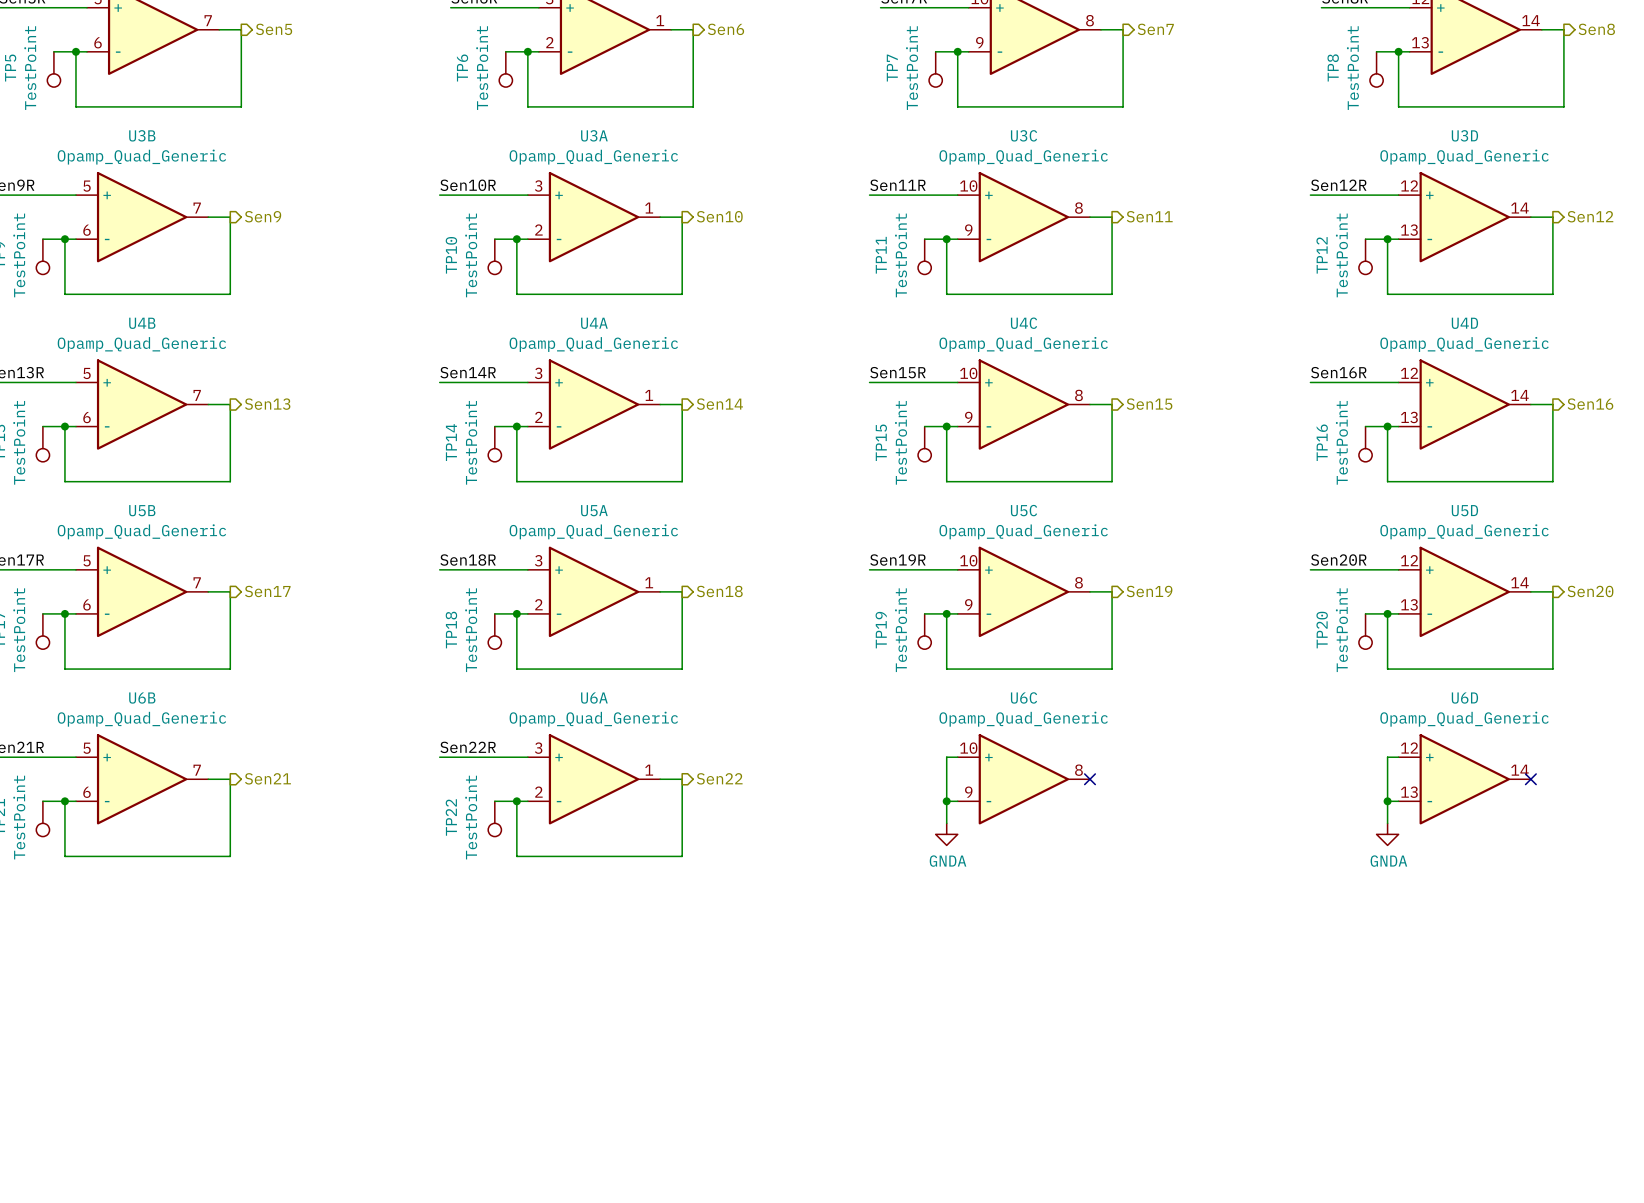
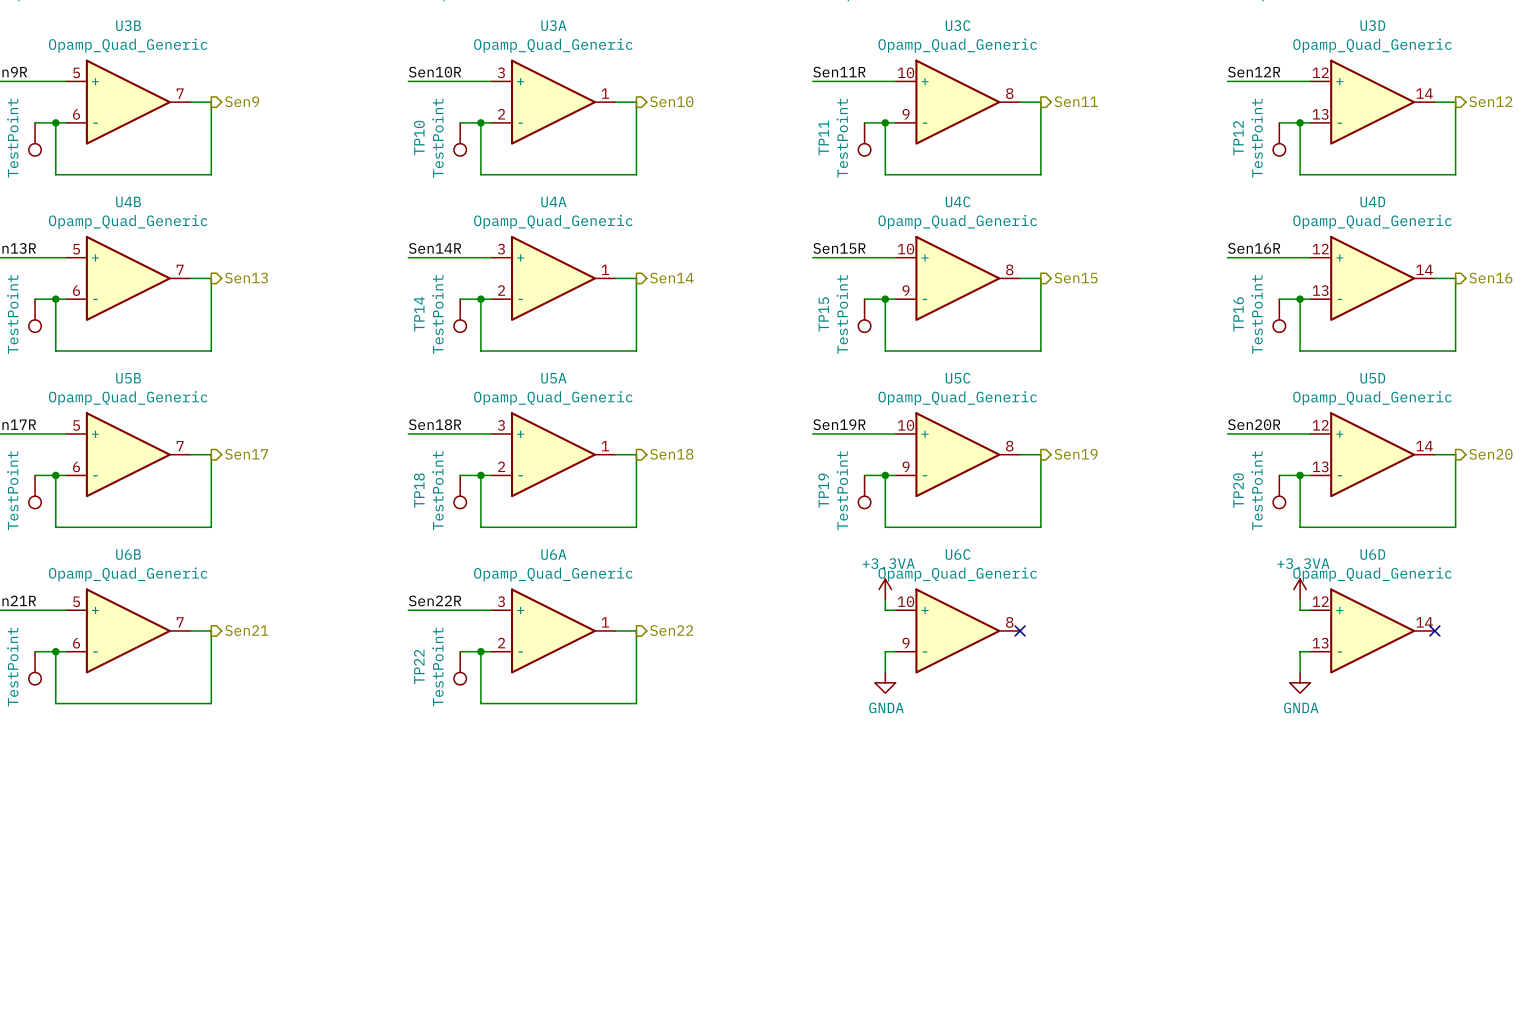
power symbol: none -> +3.3VA (885, 589)
power symbol: none -> +3.3VA (1300, 589)
wire: (946, 757) (946, 801) -> (885, 610) (885, 599)
wire: (1387, 757) (1387, 801) -> (1300, 610) (1300, 599)
junction: (946, 801) -> none
junction: (1387, 801) -> none

